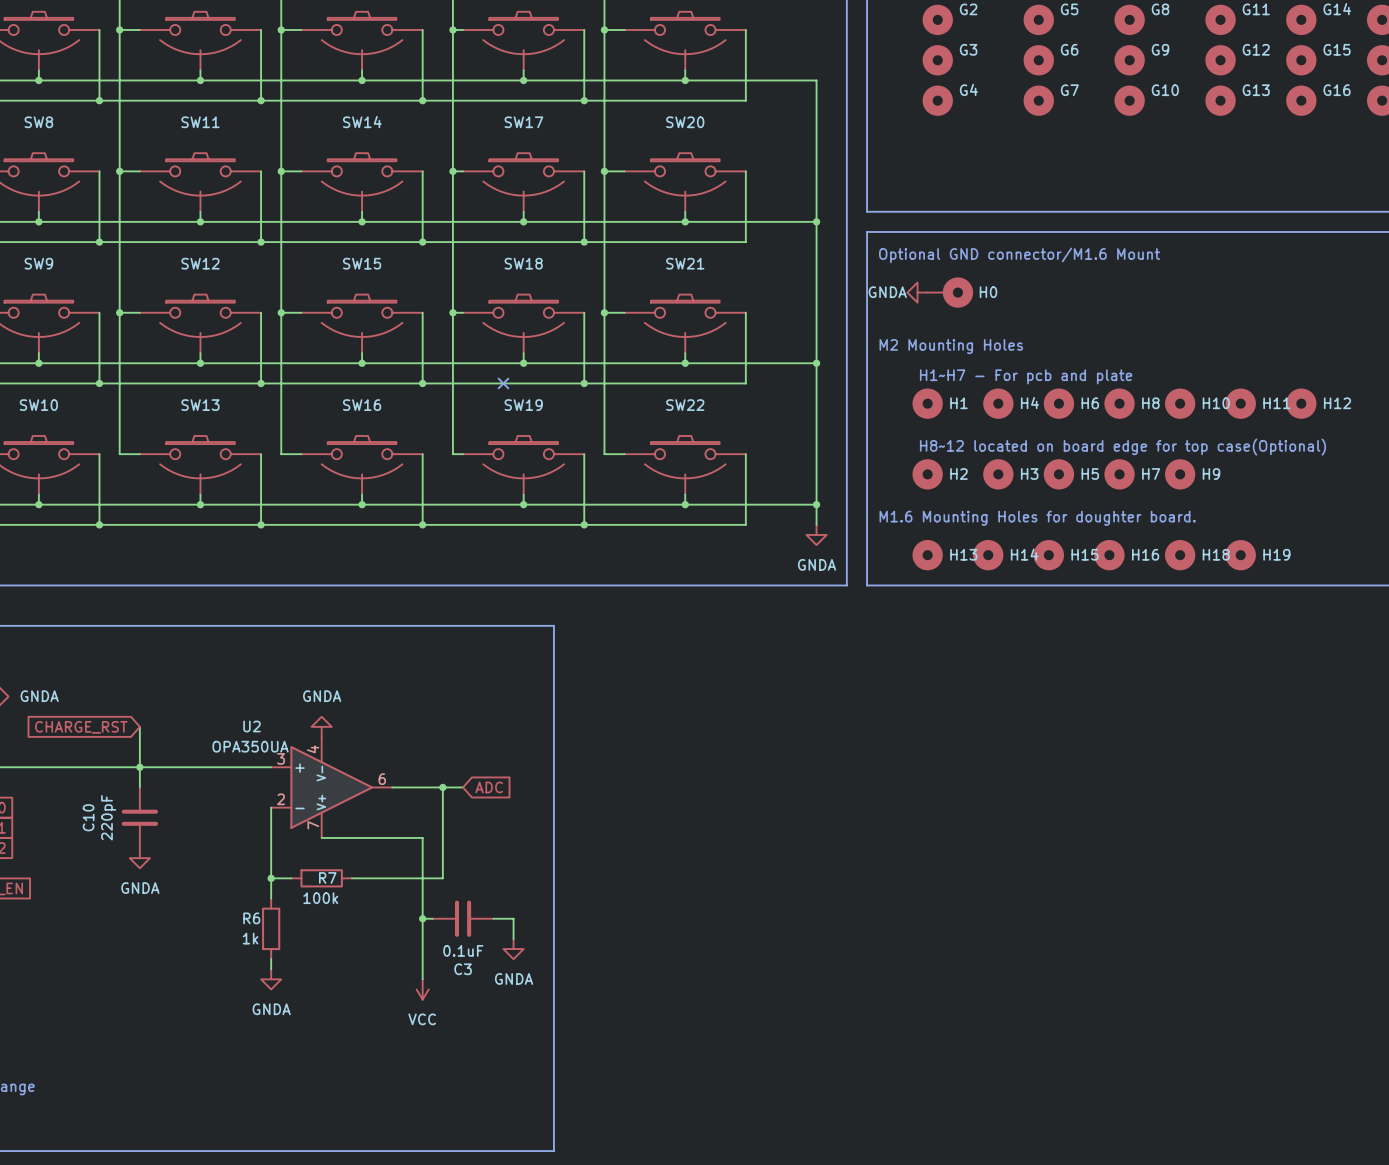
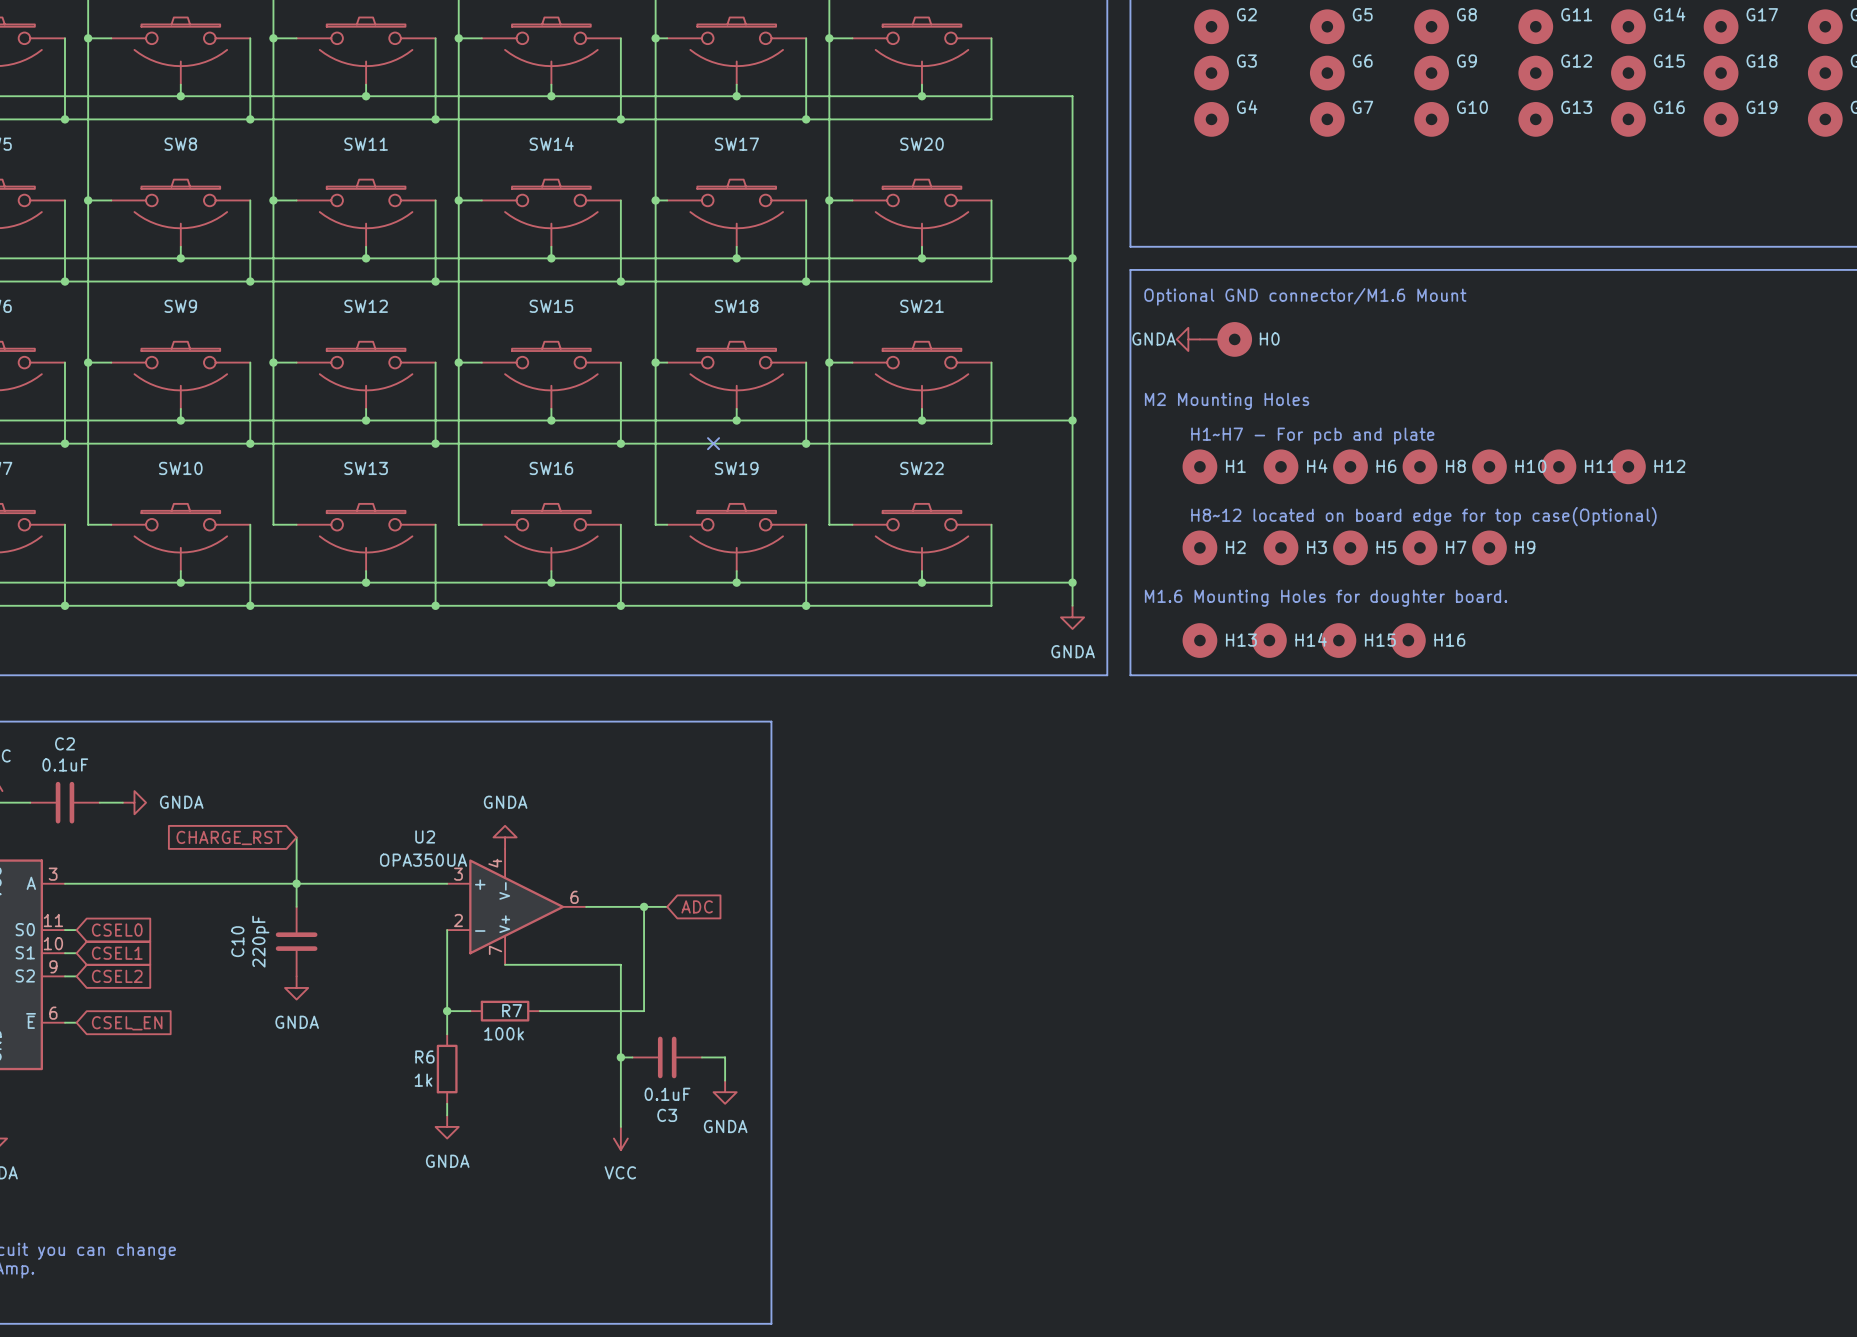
H18: (1180, 555) -> none
H19: (1240, 555) -> none

